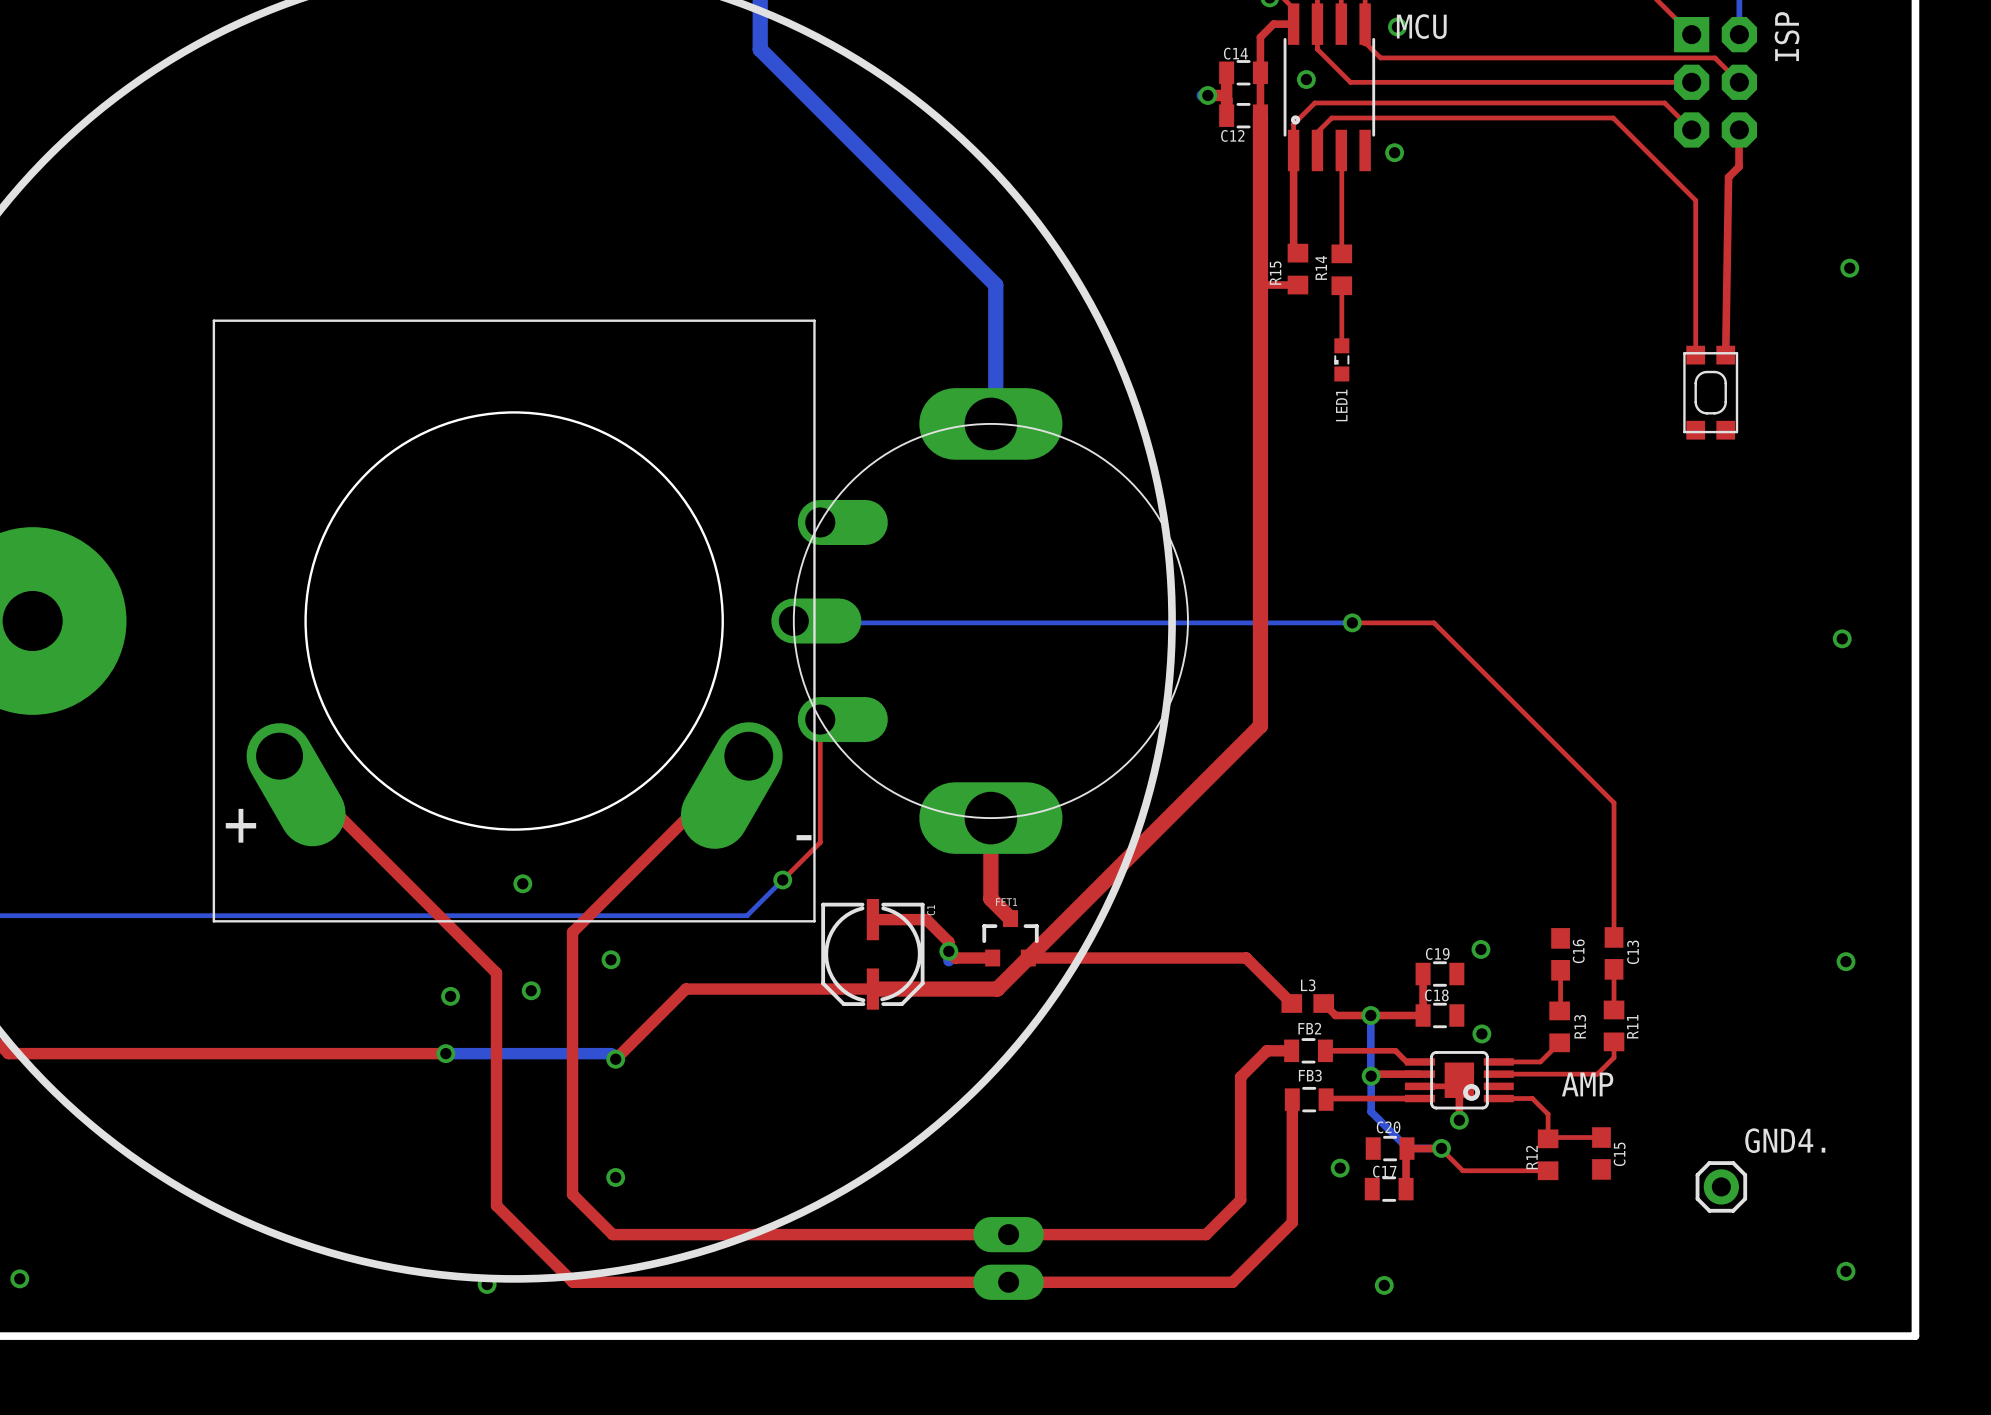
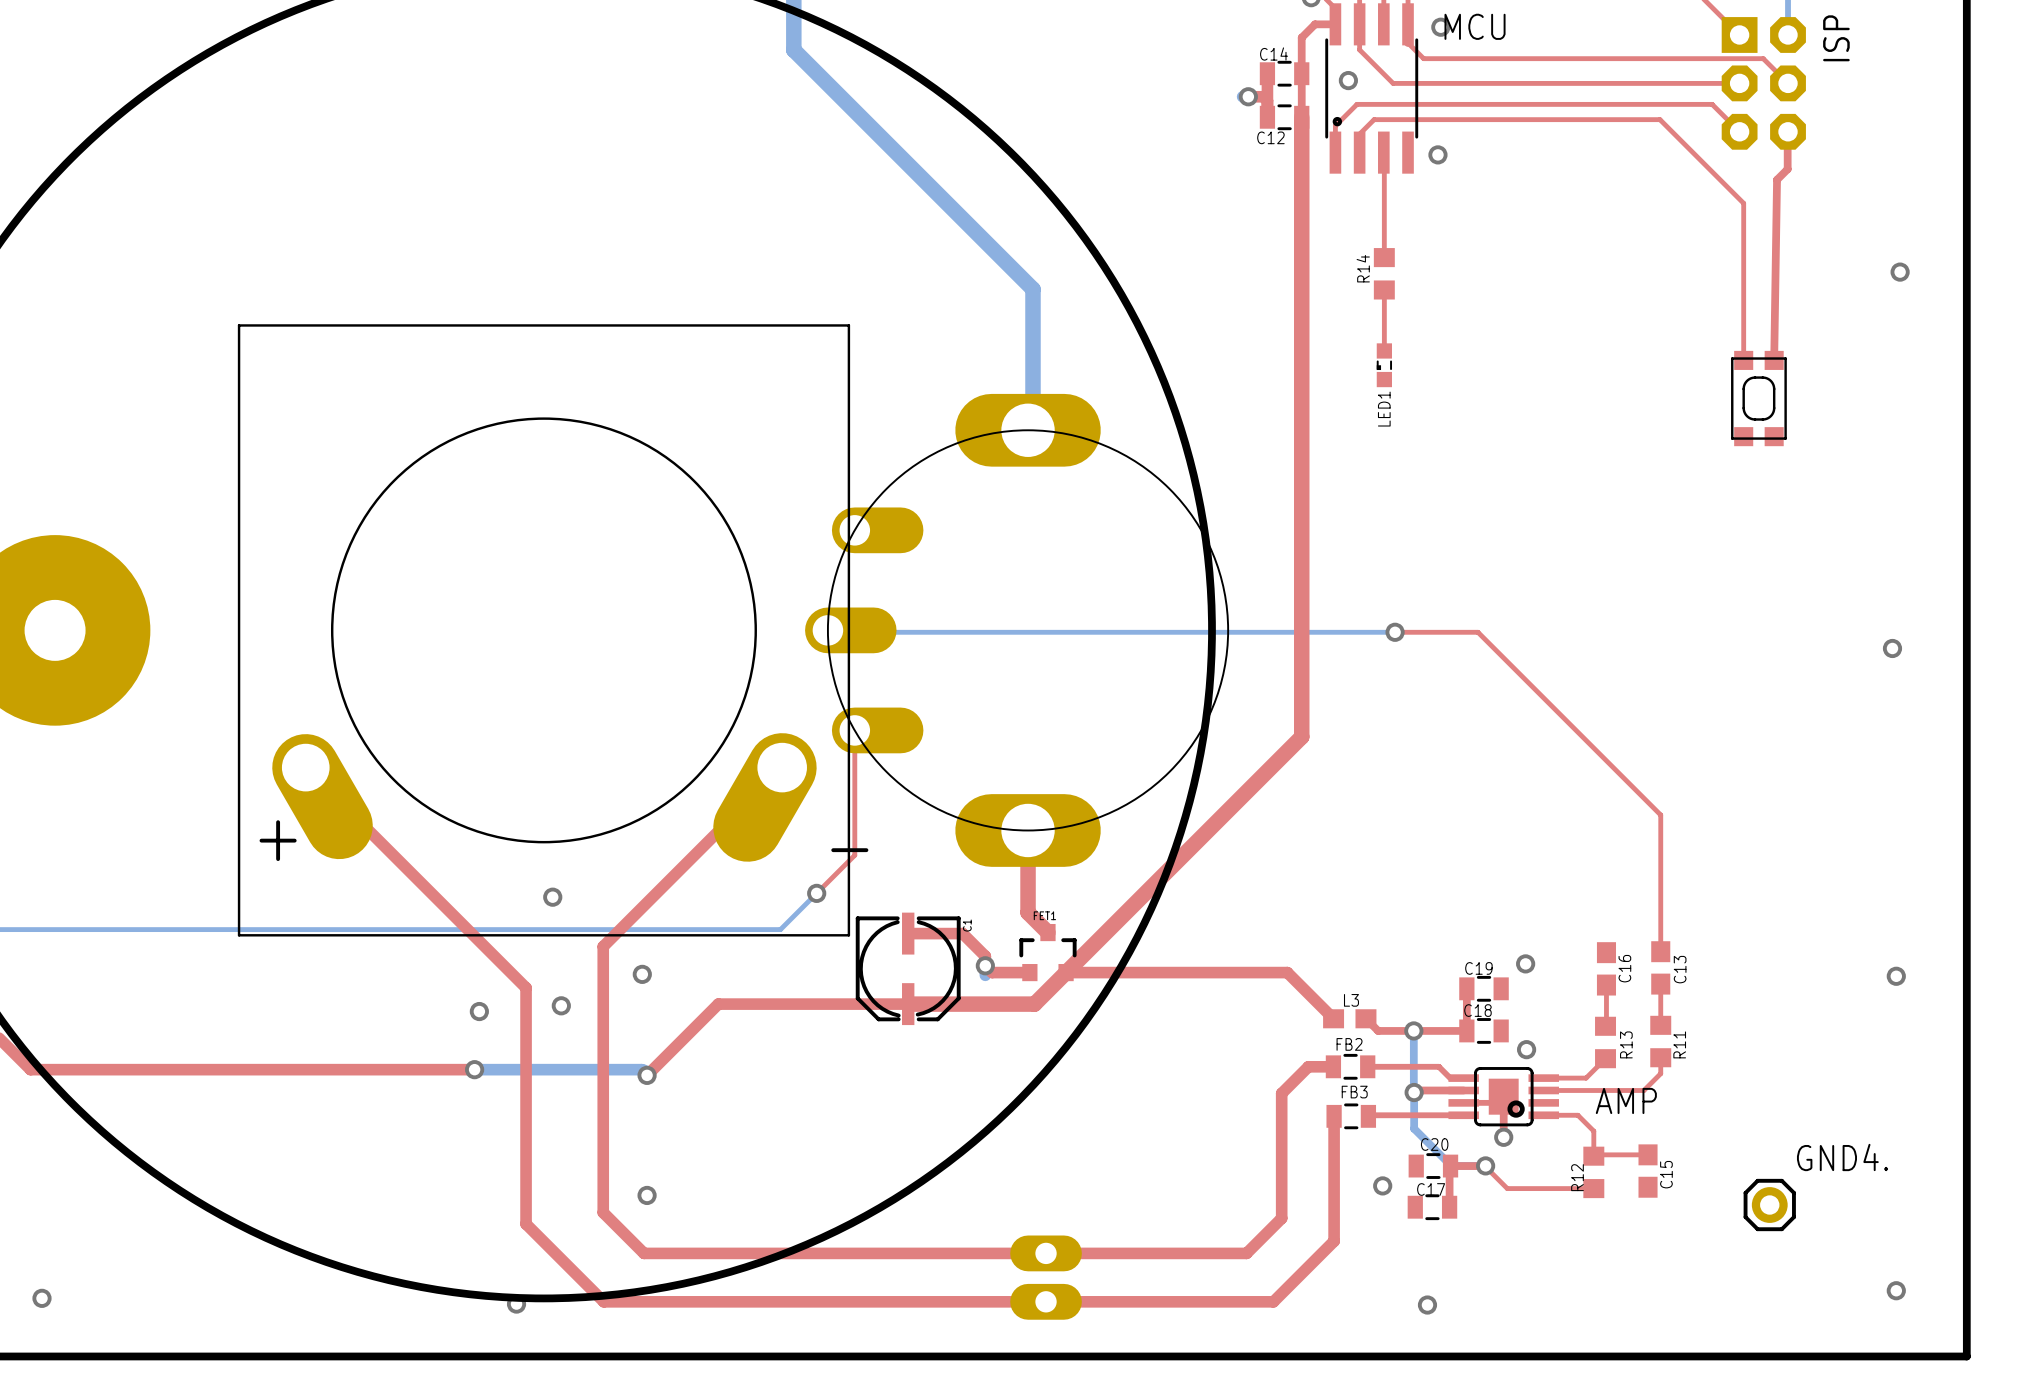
top track: (1293, 150) (1293, 253) (1297, 253) -> none
R15: (1297, 269) -> none
top track: (1260, 285) (1297, 285) -> none

